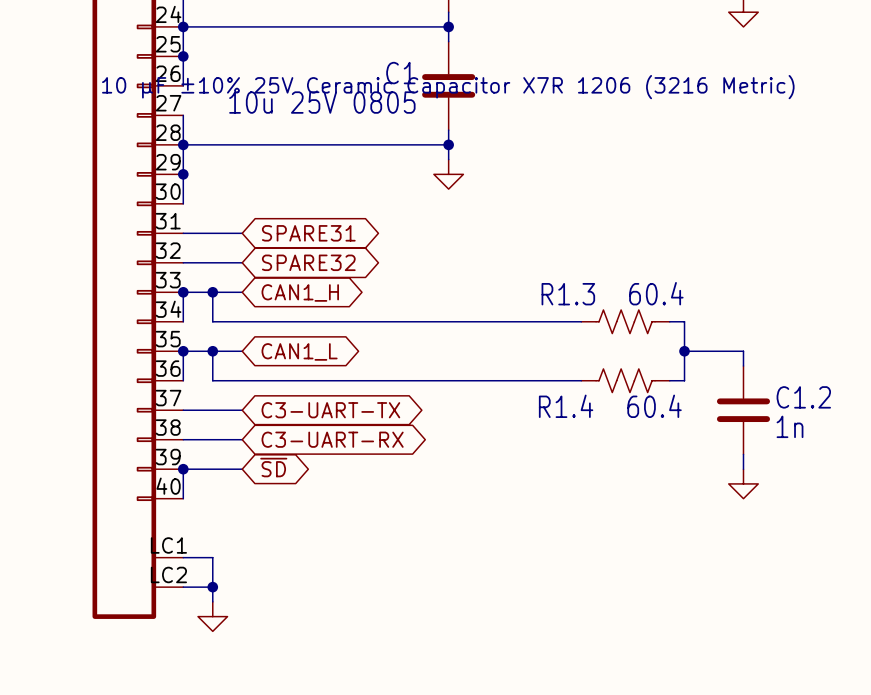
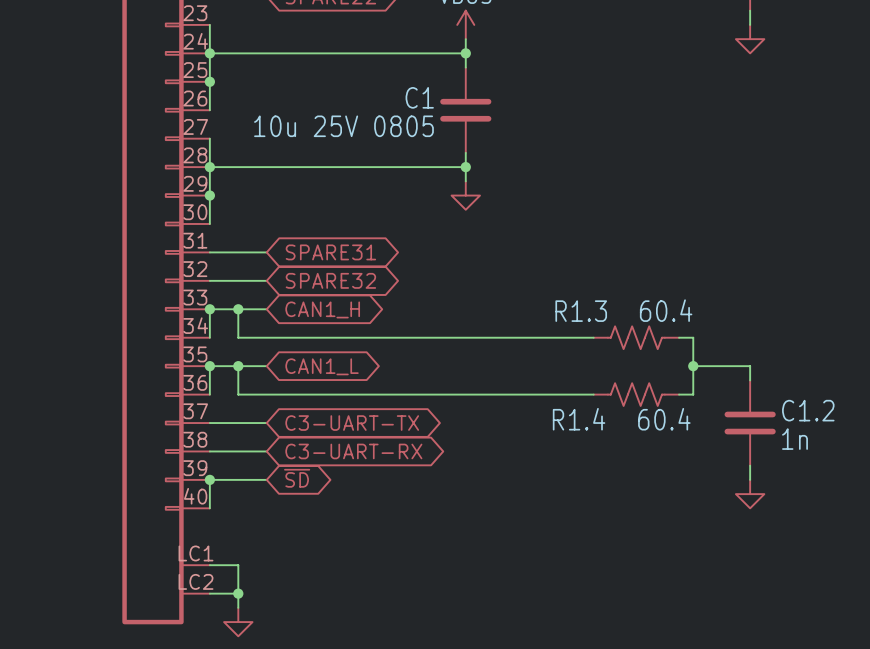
C1 text: 10 µF ±10% 25V Ceramic Capacitor X7R 1206 (3216 Metric) (448, 87) -> none

